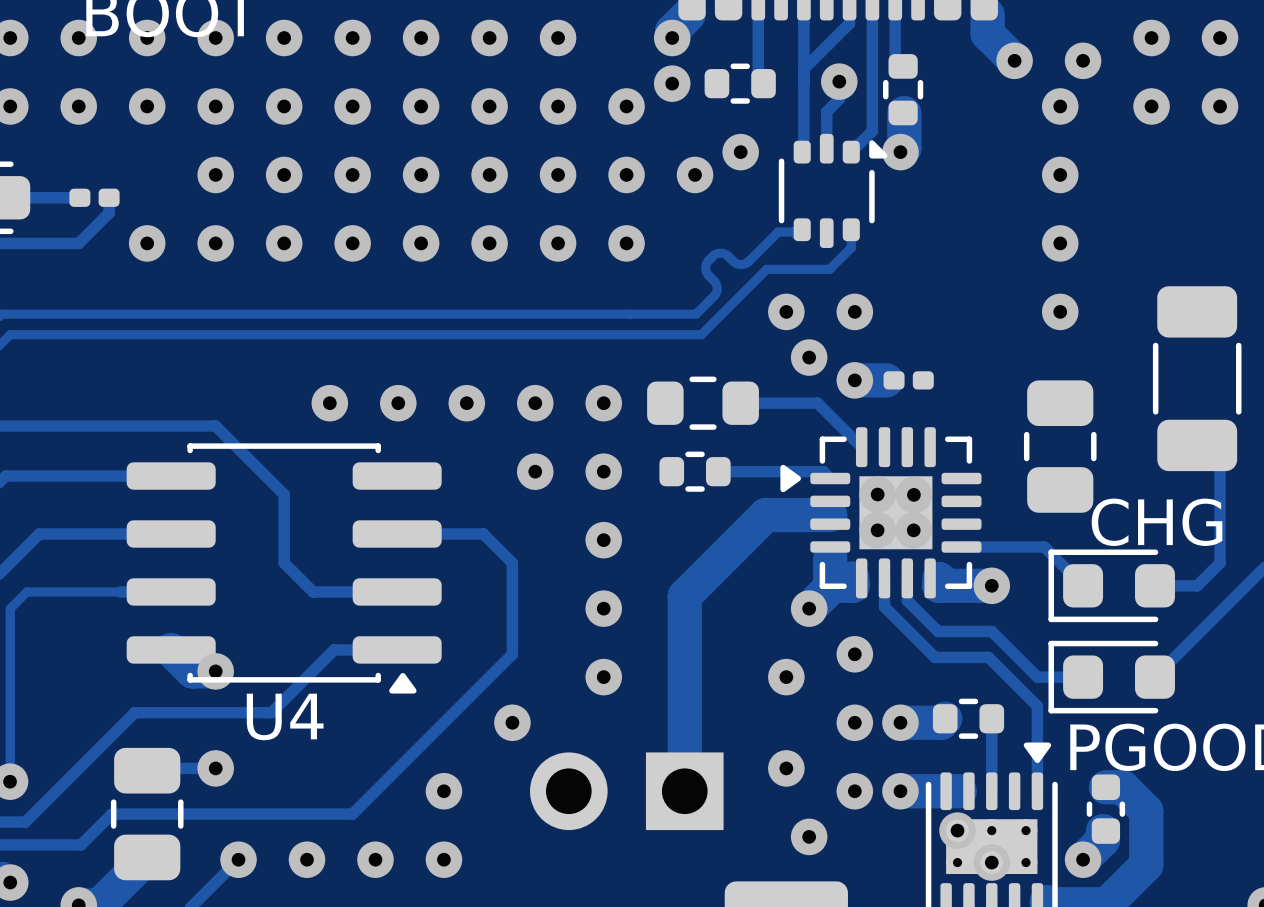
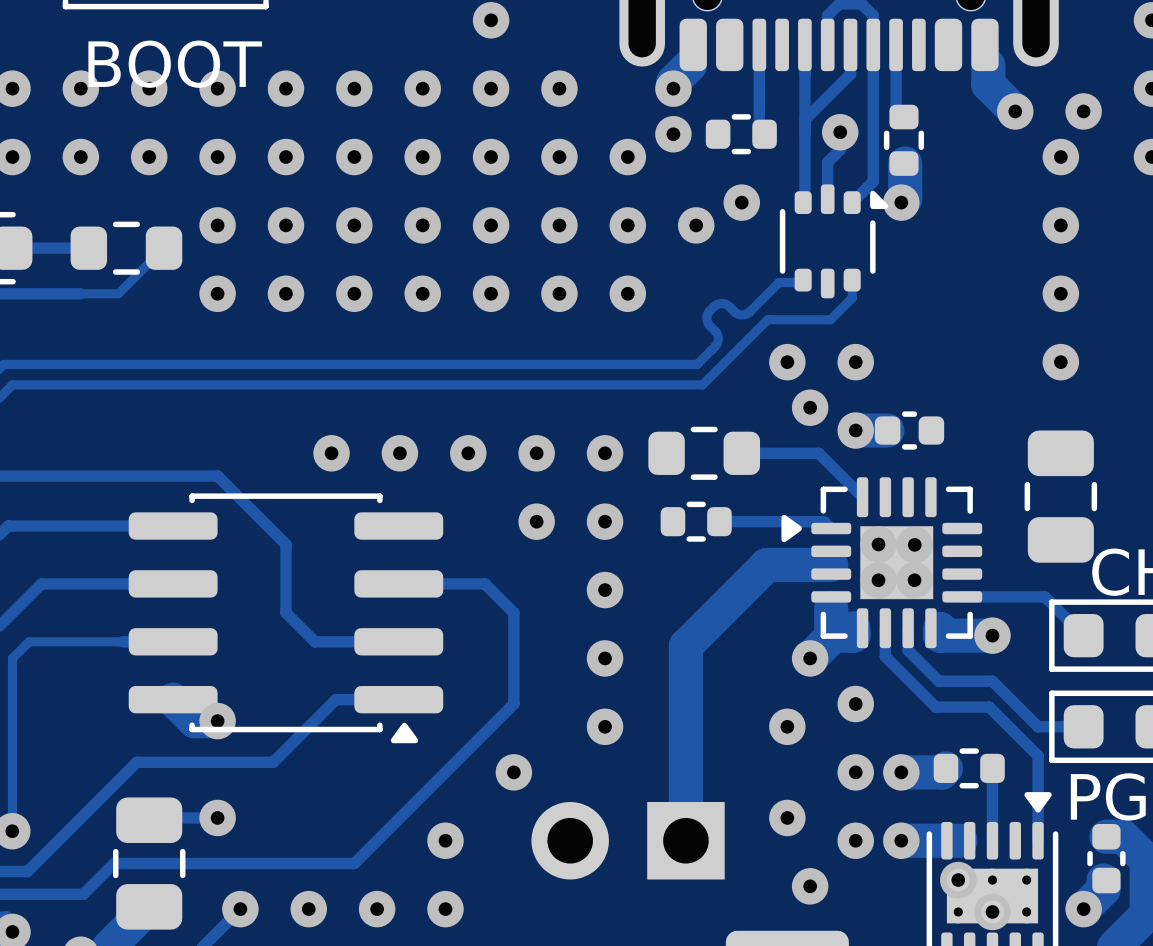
part footprint: [69, 188, 120, 207] -> [70, 221, 183, 275]
track: (109, 197) (109, 213) (78, 243) -> (164, 248) (118, 293) (80, 293)
via: (147, 243) -> none
part footprint: [883, 371, 934, 390] -> [874, 411, 945, 450]
U4 name: U4 (285, 716) -> none

